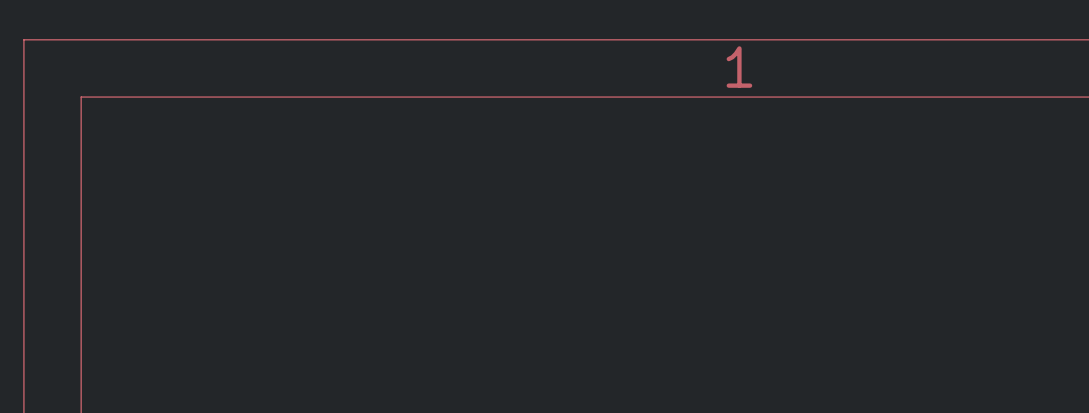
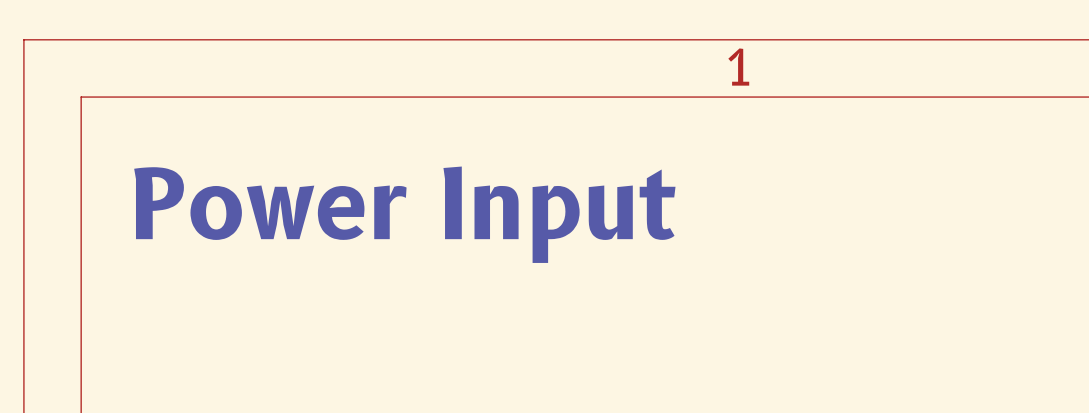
text: none -> Power Input (404, 214)

